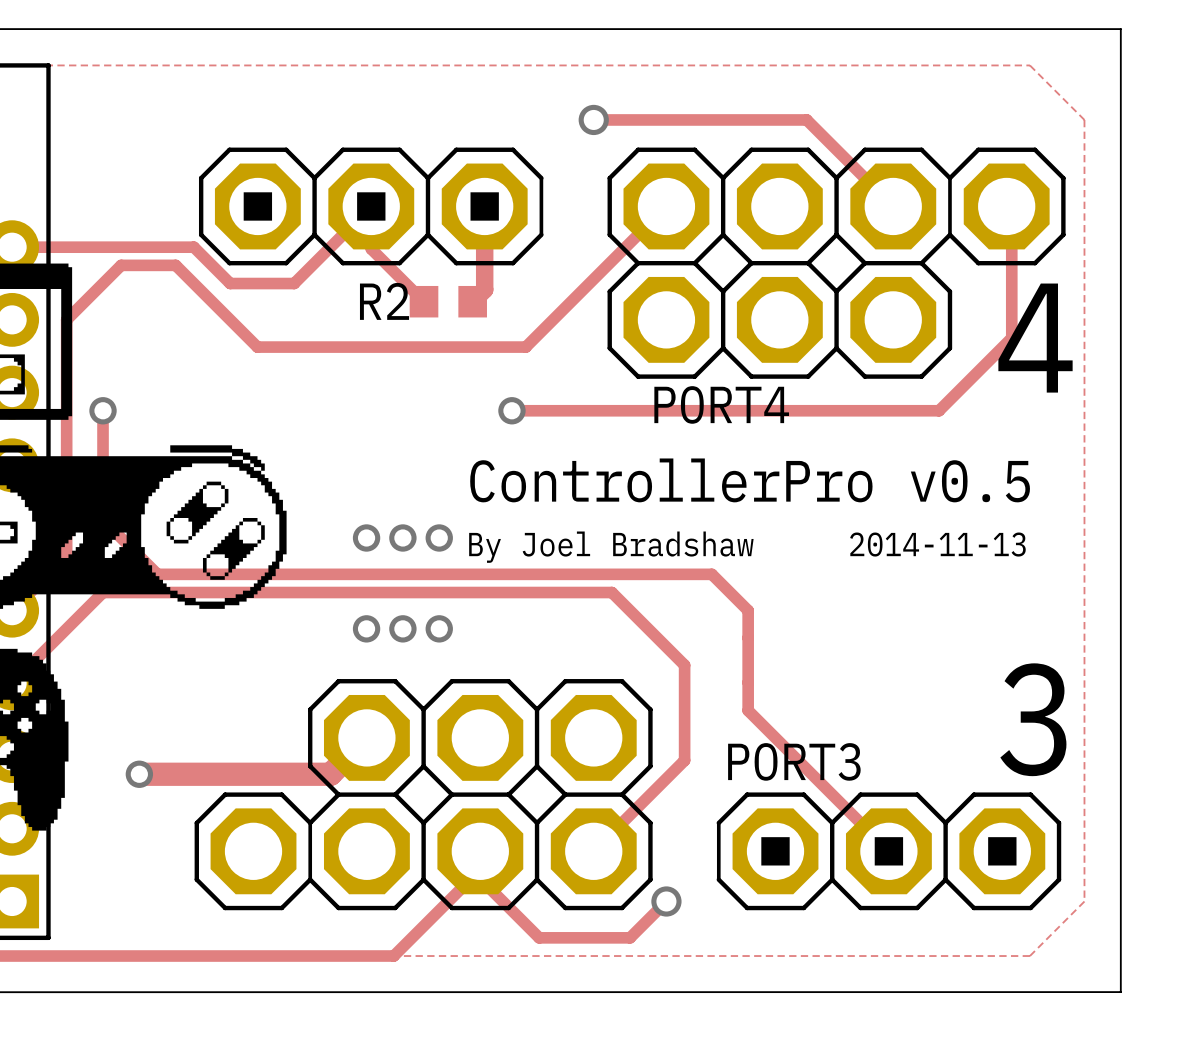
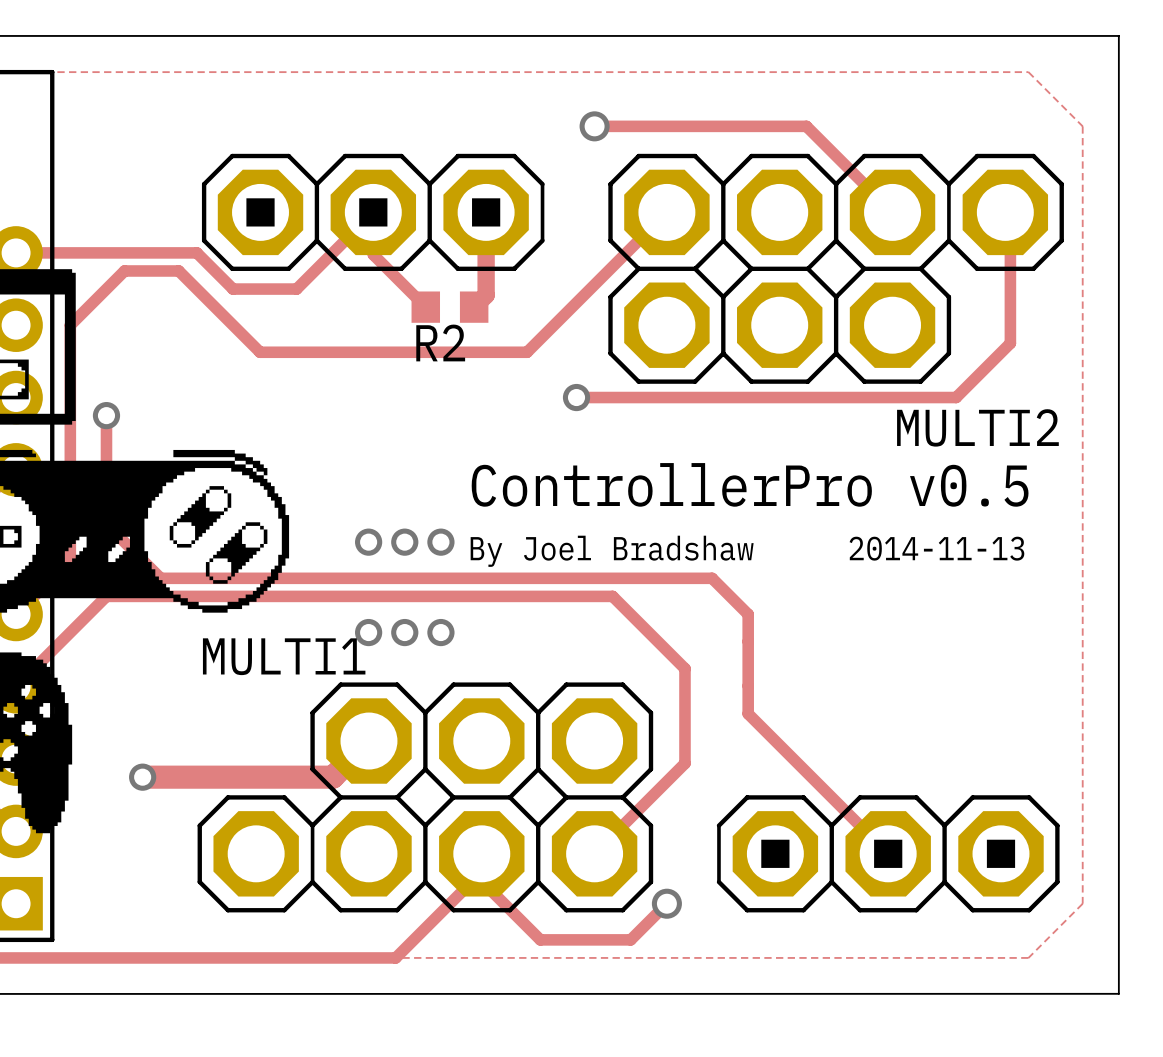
R2 name position: R2 (384, 301) -> R2 (440, 342)
text: 4 (1035, 338) -> none
track: (957, 392) (939, 410) (511, 410) -> (956, 397) (576, 397)
PORT4 name: PORT4 (721, 404) -> MULTI2 (977, 427)
via position: (511, 410) -> (576, 397)
text: 3 (1033, 719) -> none
PORT3 name: PORT3 (794, 761) -> MULTI1 (284, 656)

